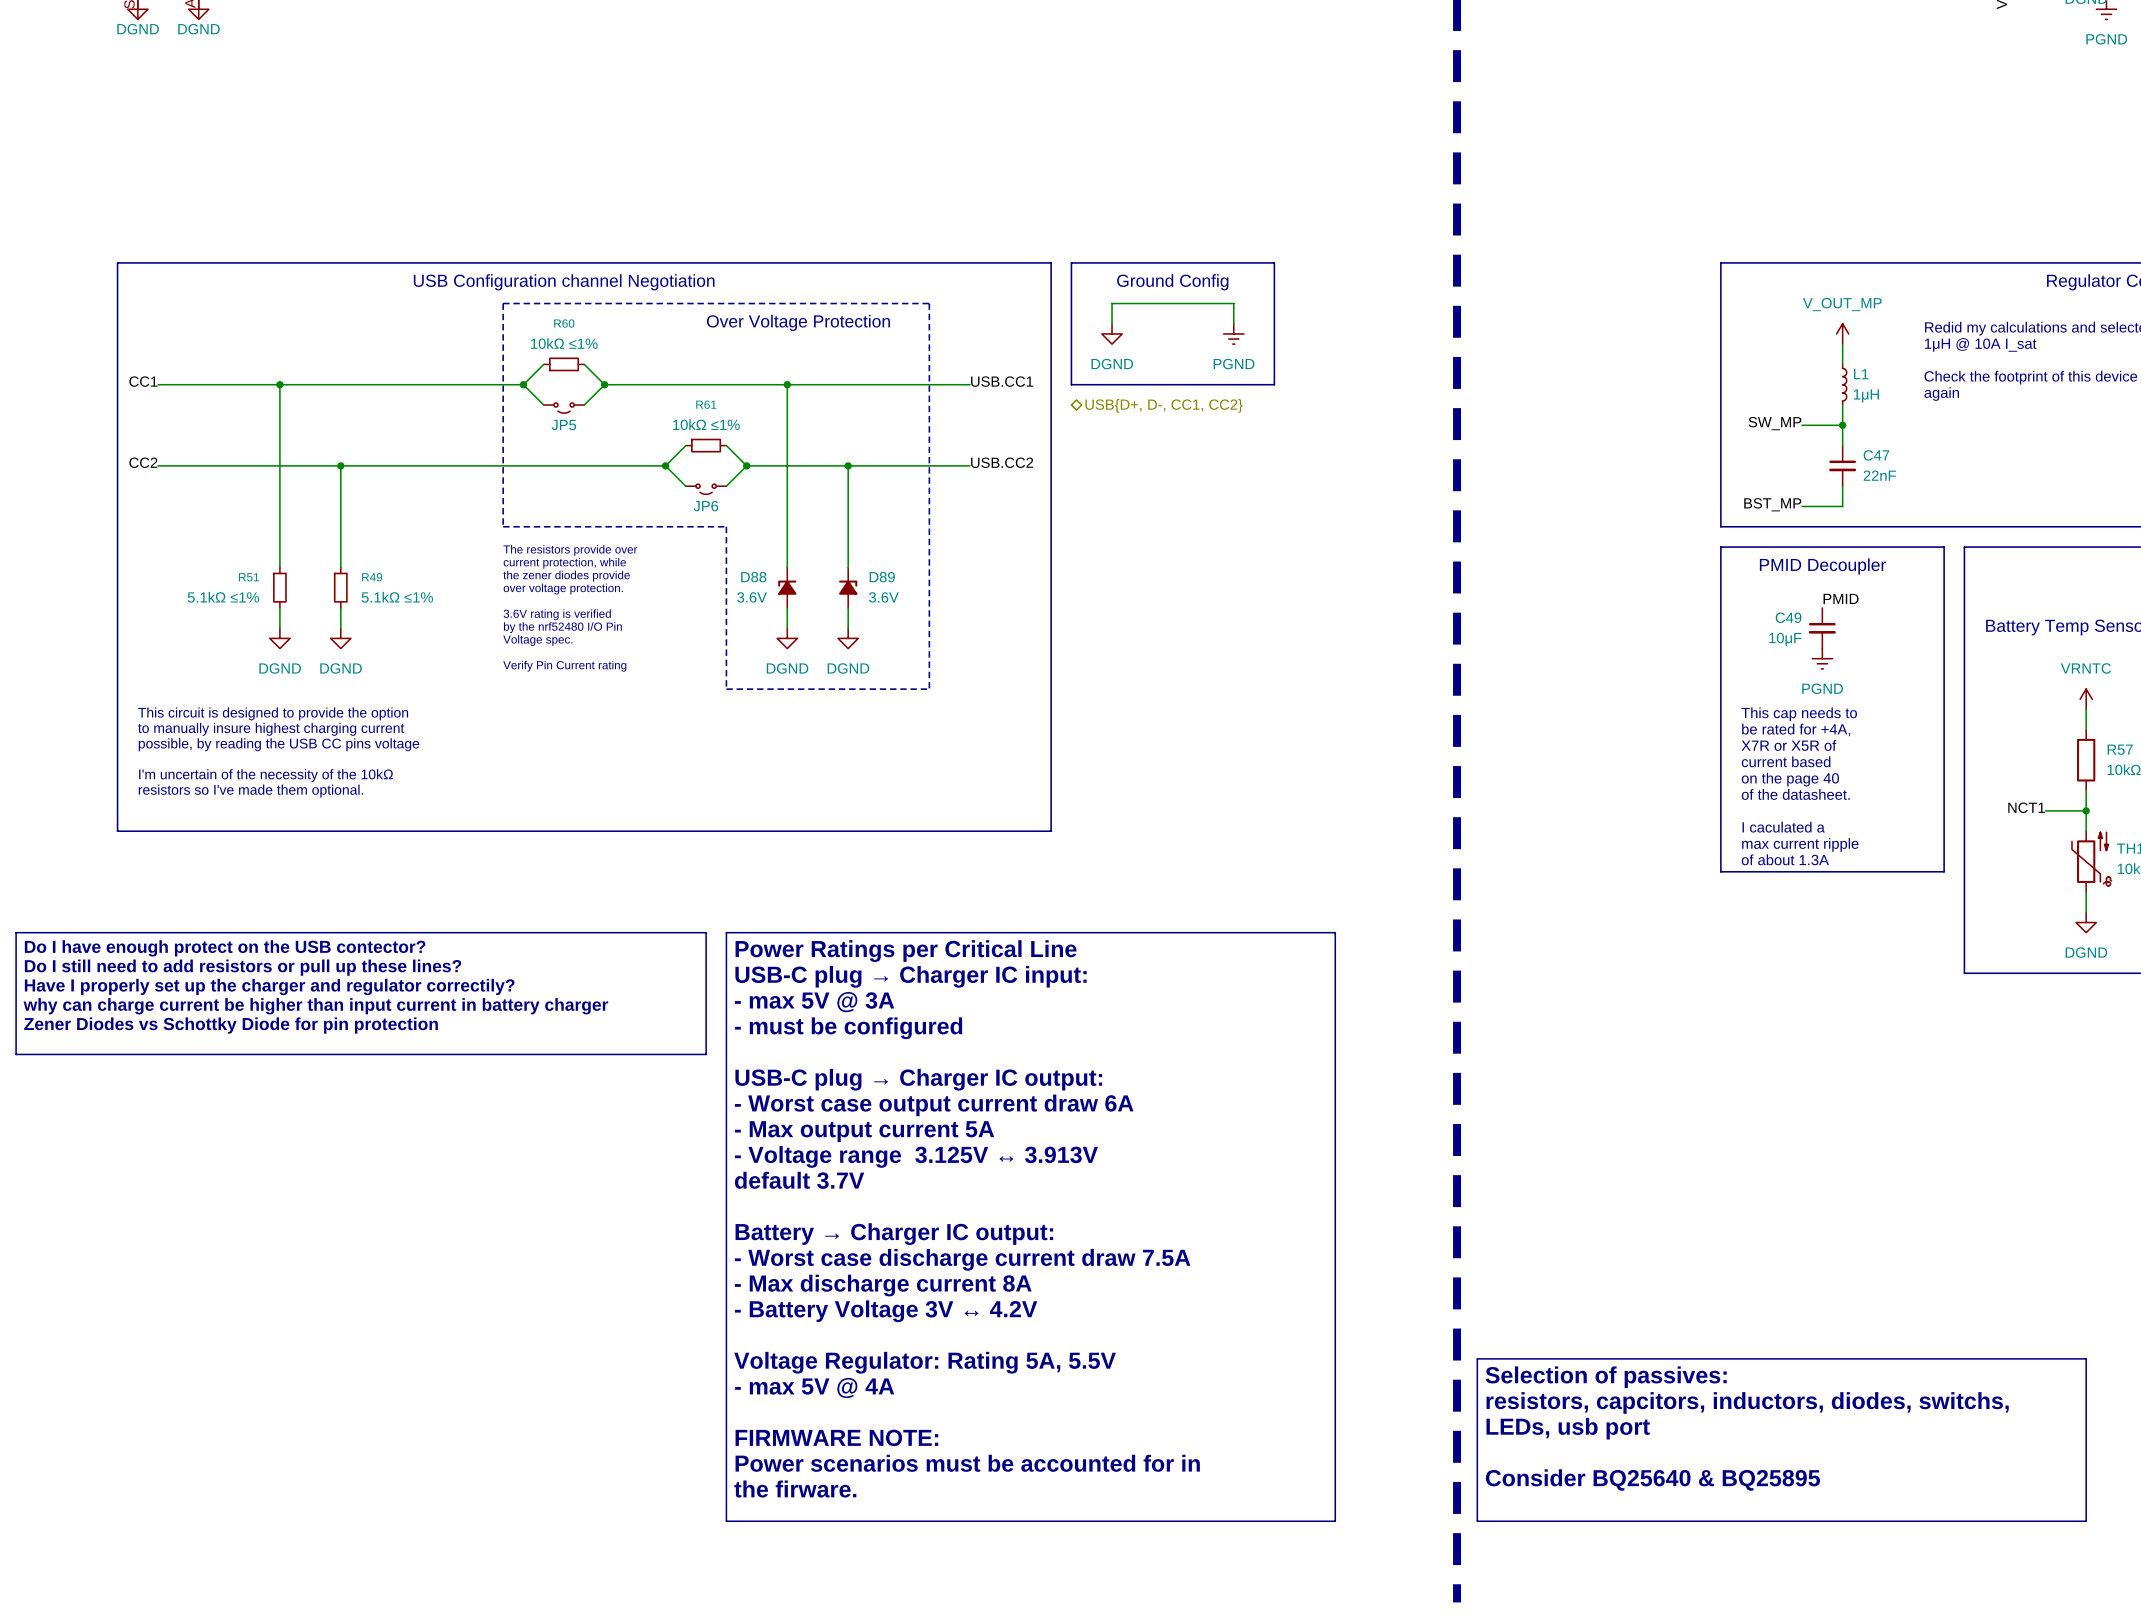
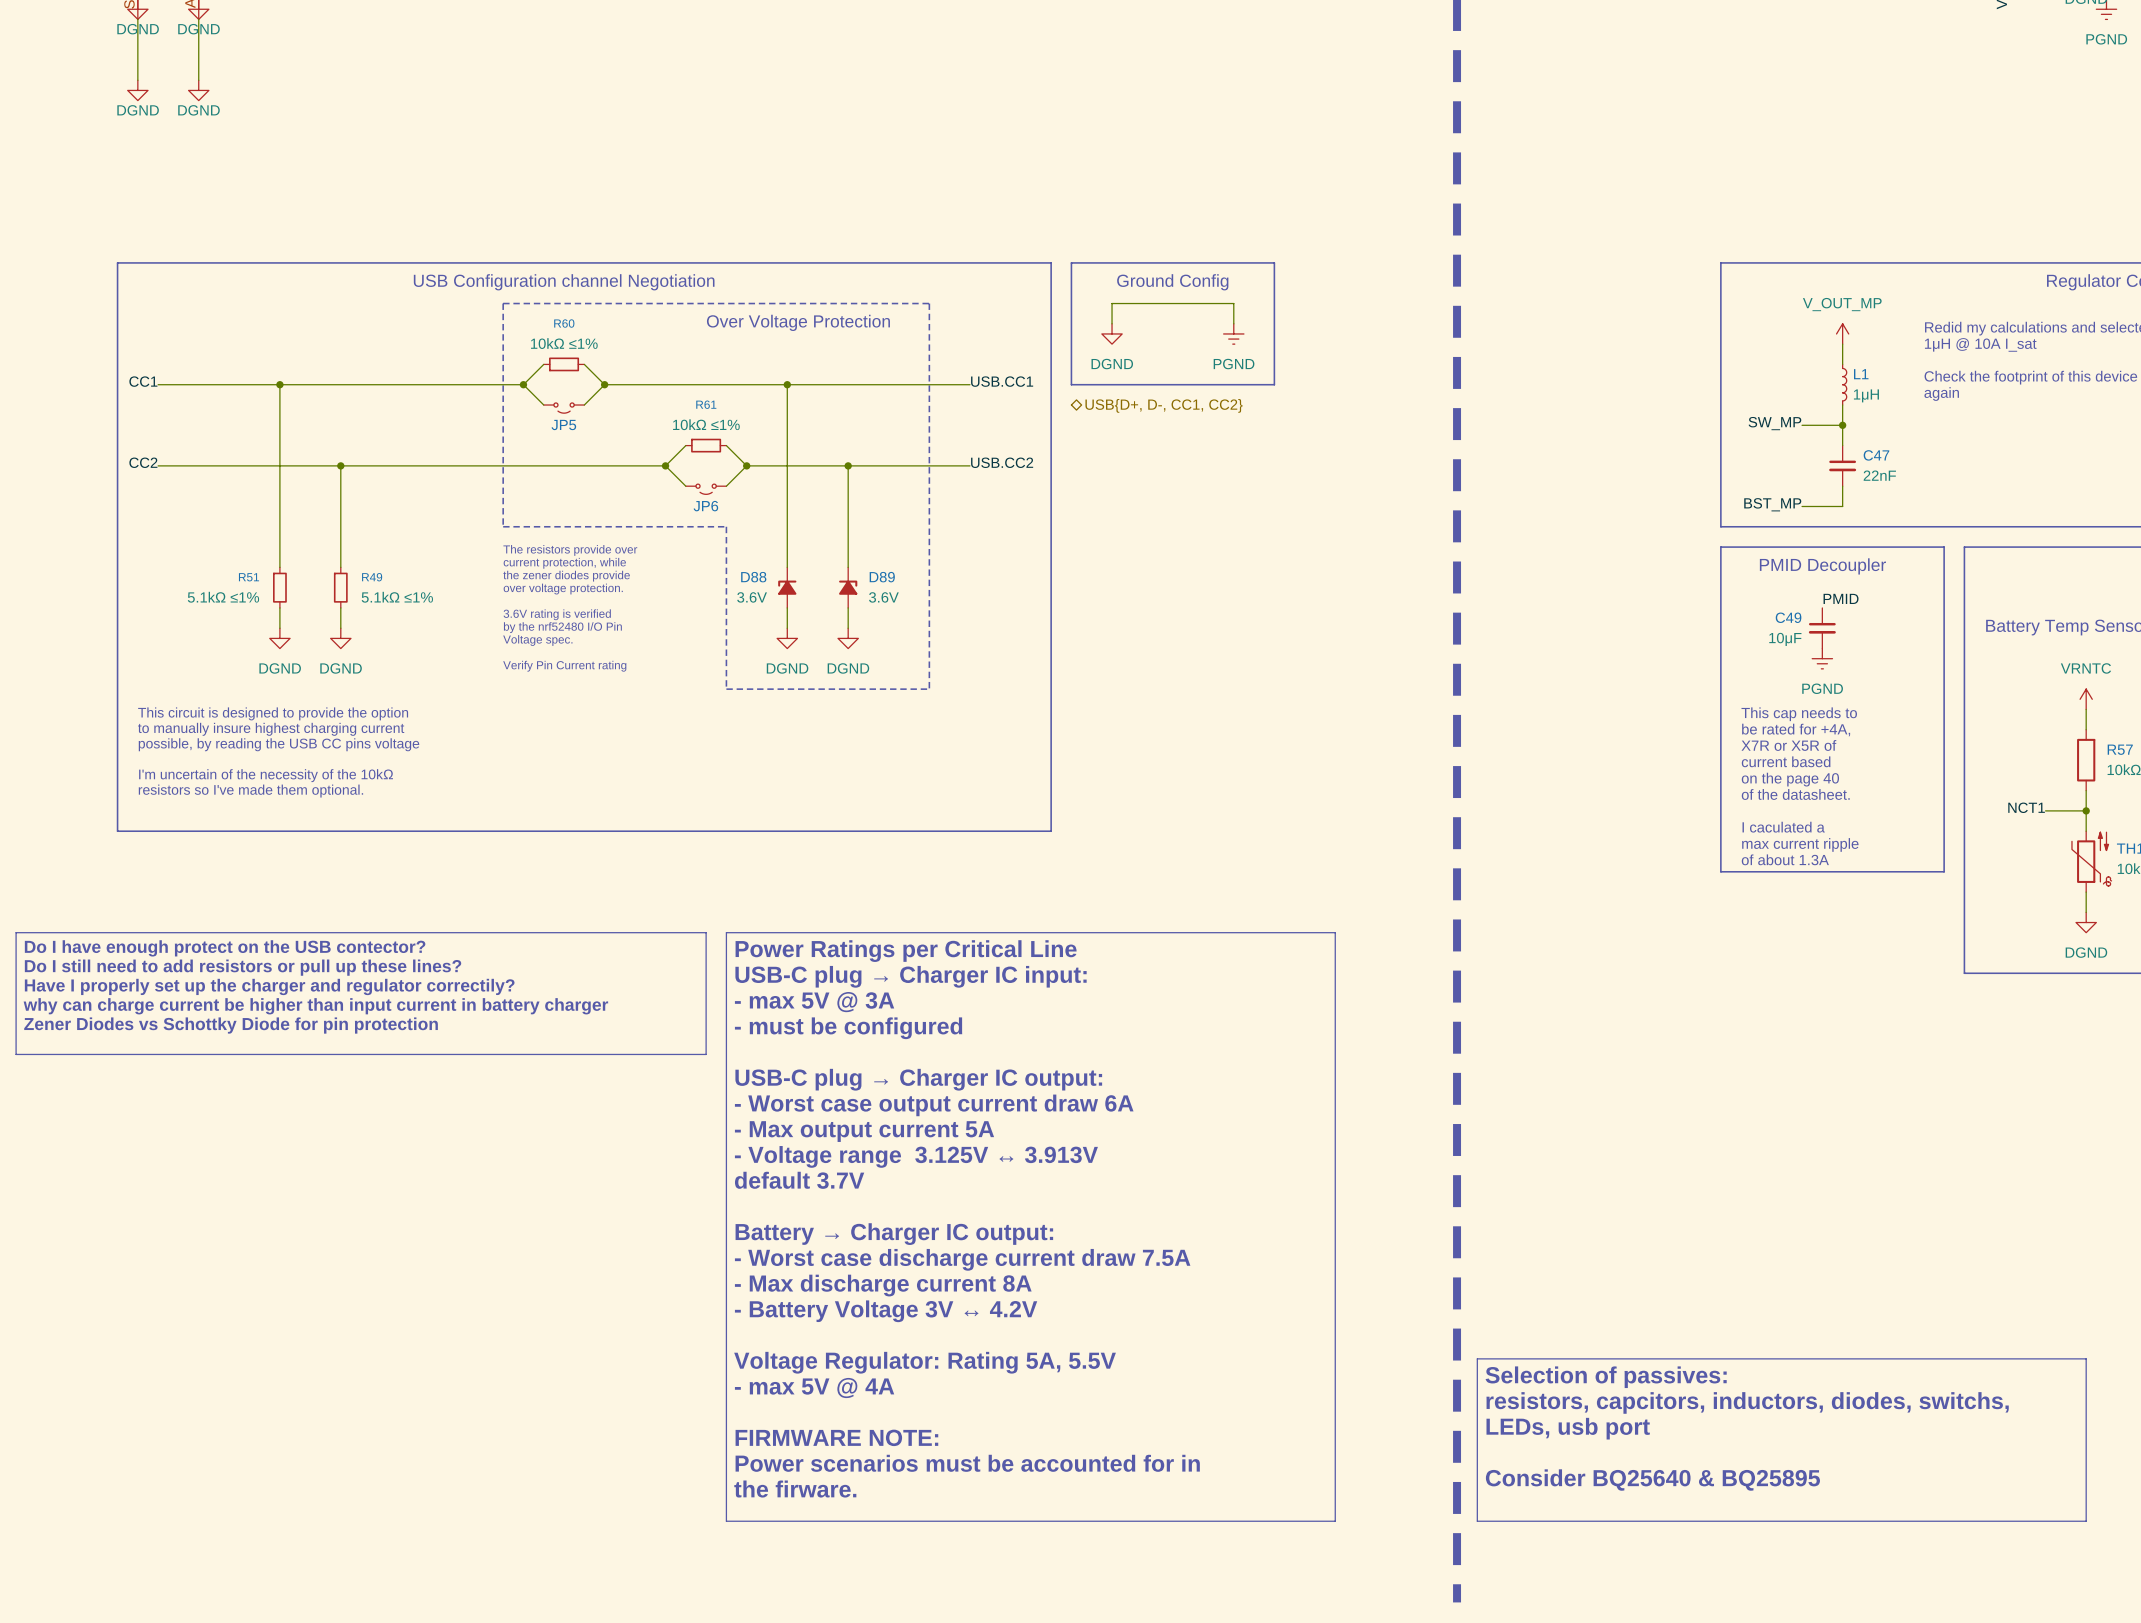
wire: none -> (137, 19) (137, 80)
wire: none -> (198, 19) (198, 80)
power symbol: none -> DGND (137, 90)
power symbol: none -> DGND (198, 90)

